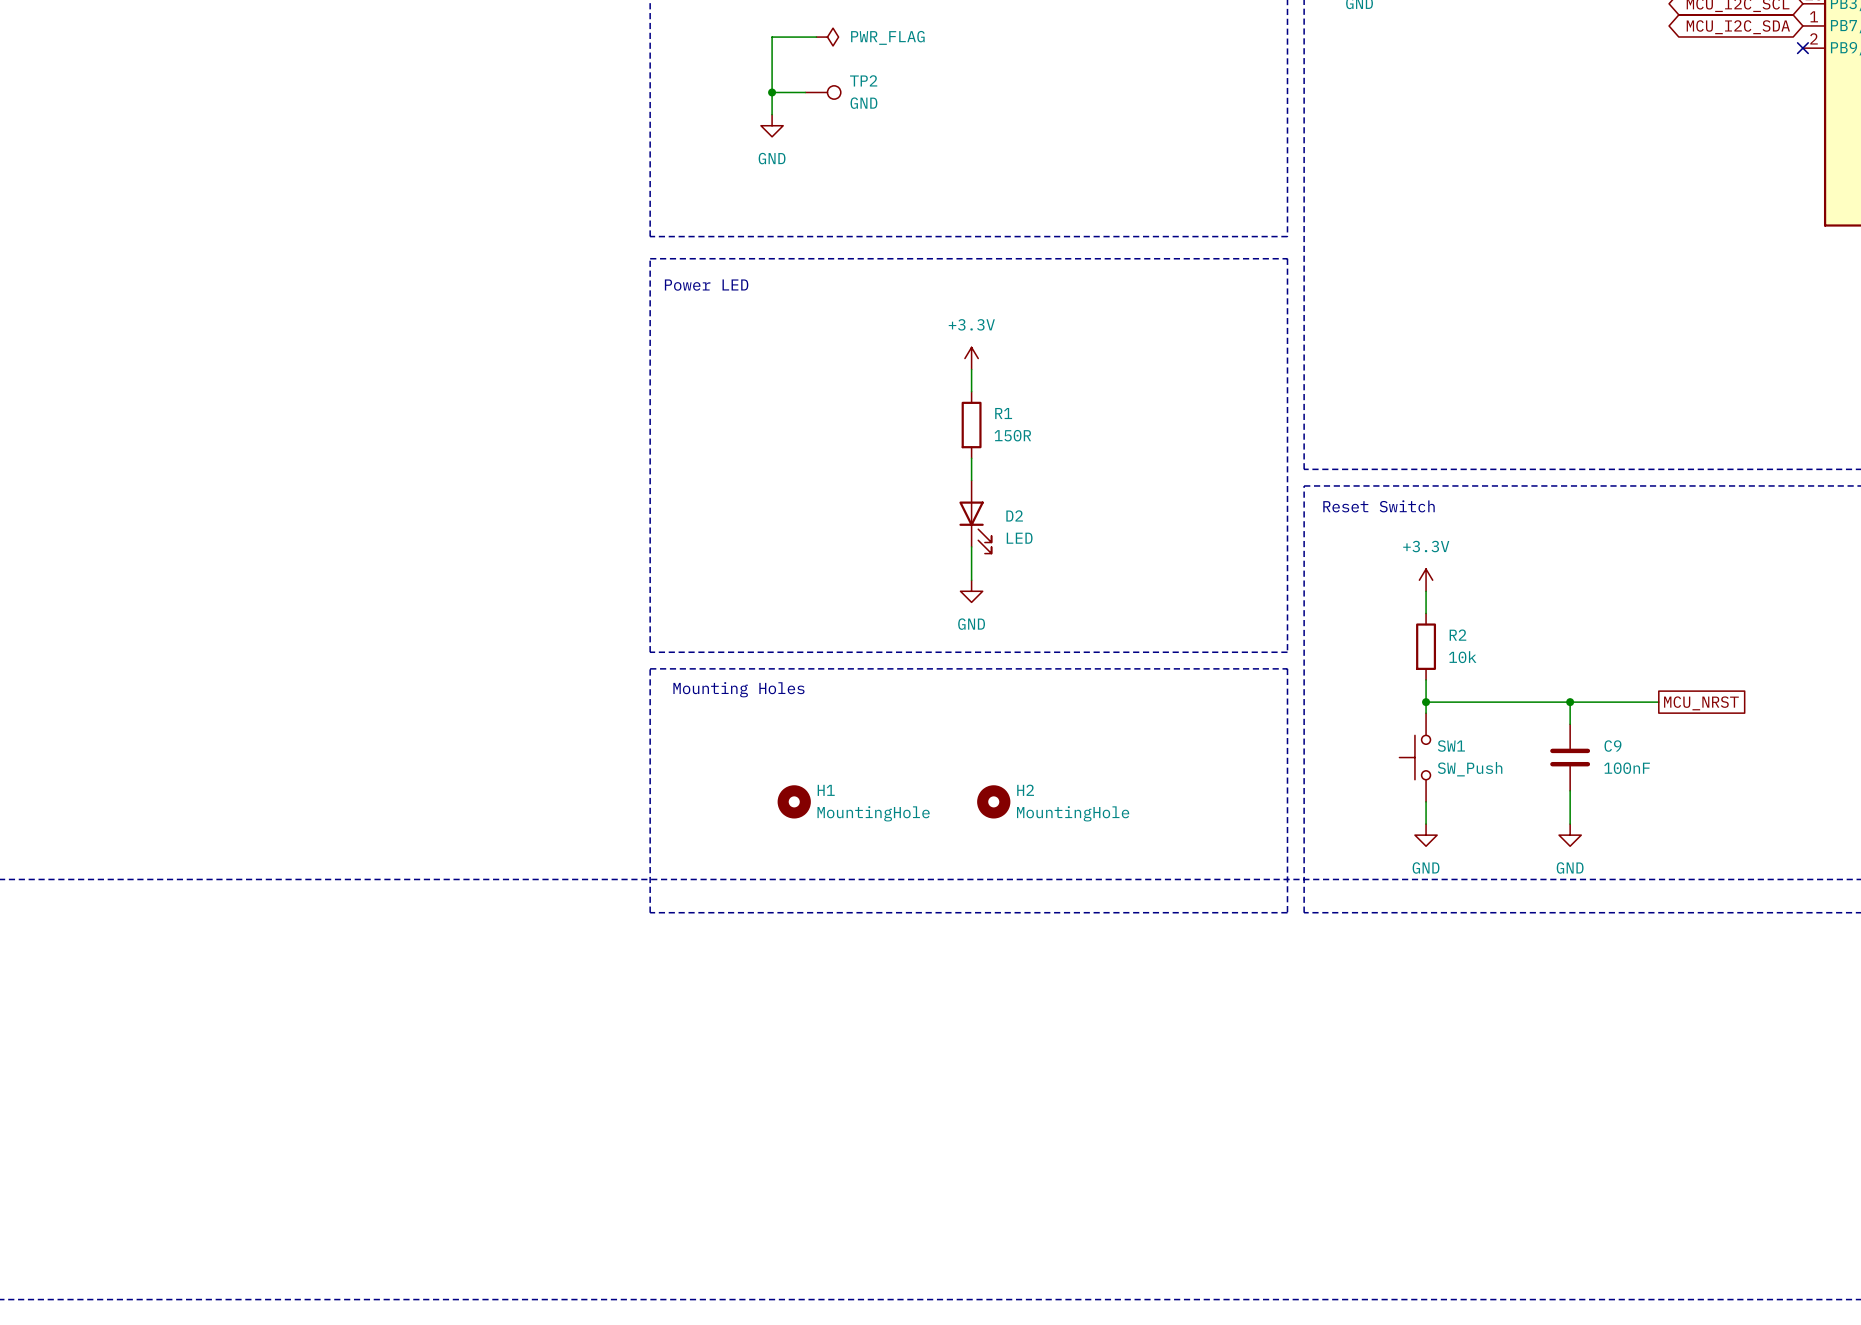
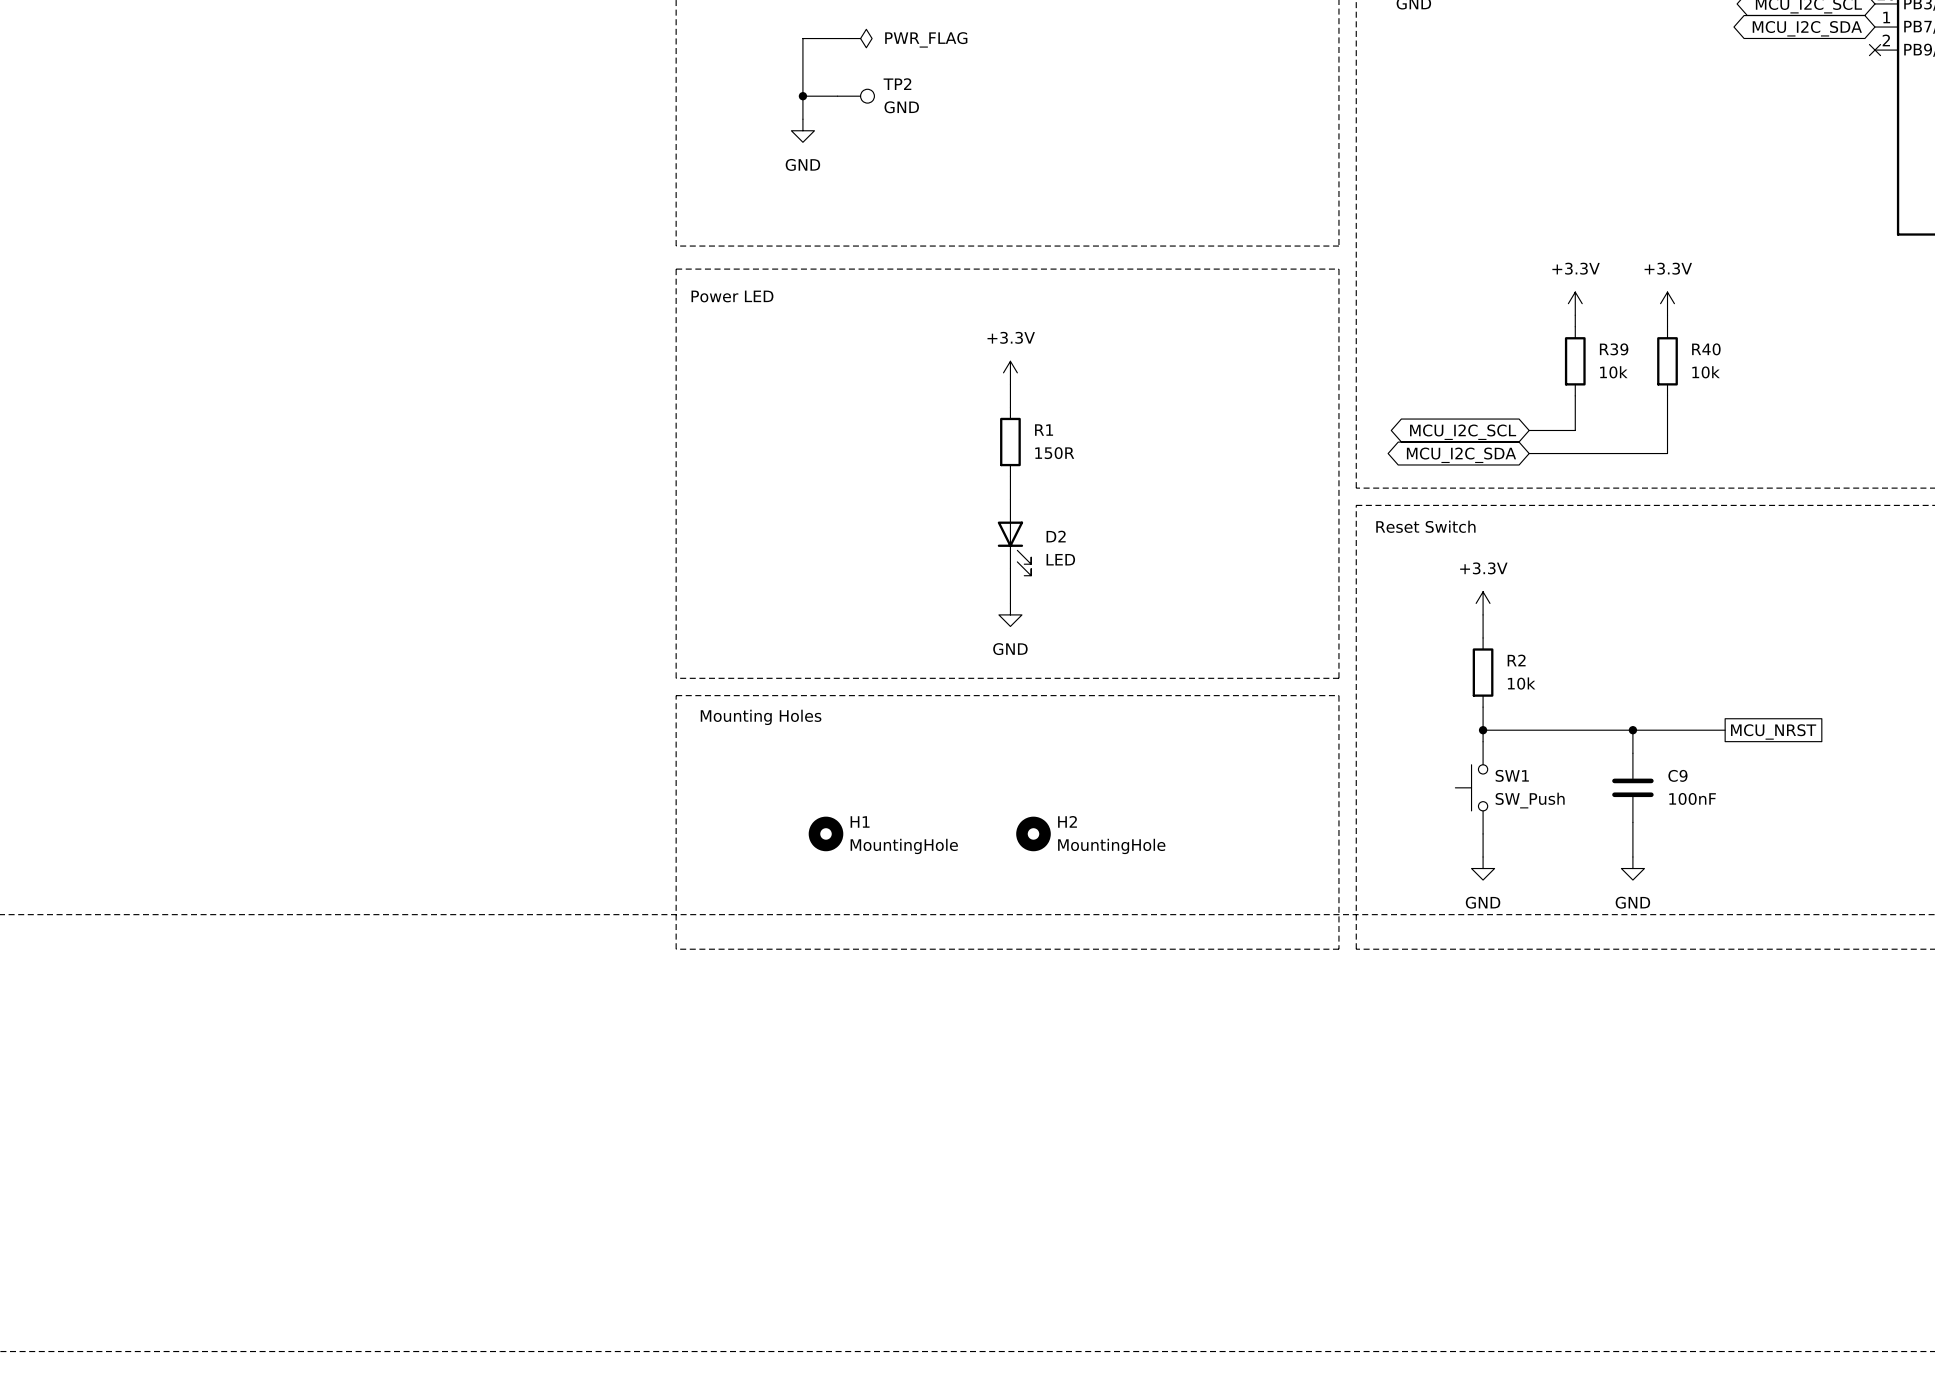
power symbol: none -> +3.3V (1575, 303)
power symbol: none -> +3.3V (1667, 303)
wire: none -> (1575, 315) (1575, 326)
wire: none -> (1667, 315) (1667, 326)
R39: none -> 10k (1575, 361)
R40: none -> 10k (1667, 361)
wire: none -> (1575, 395) (1575, 430) (1529, 430)
wire: none -> (1667, 395) (1667, 453) (1529, 453)
global label: none -> MCU_I2C_SCL (1463, 432)
global label: none -> MCU_I2C_SDA (1461, 455)

